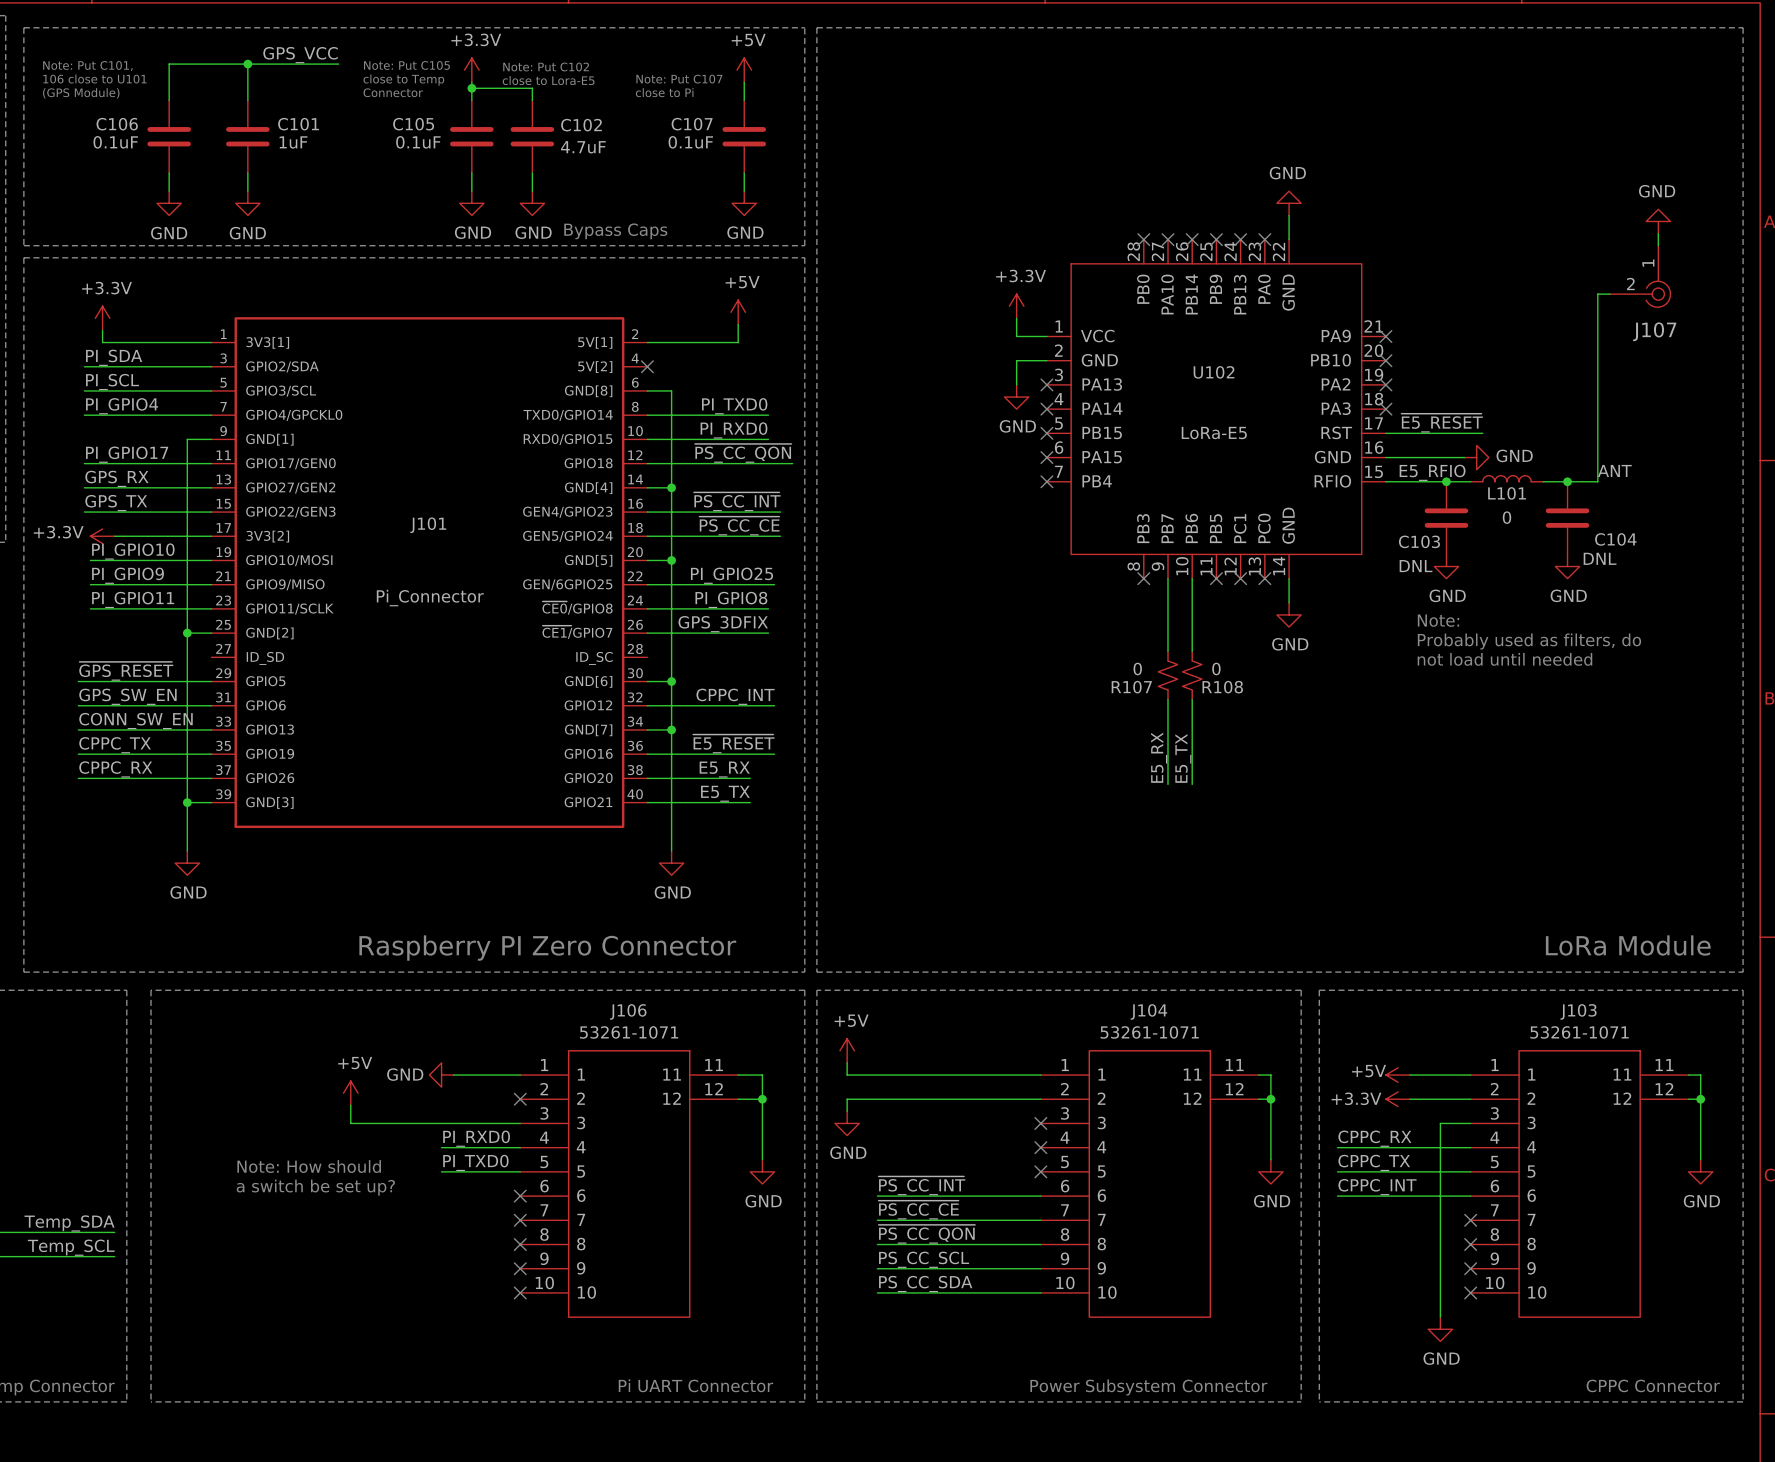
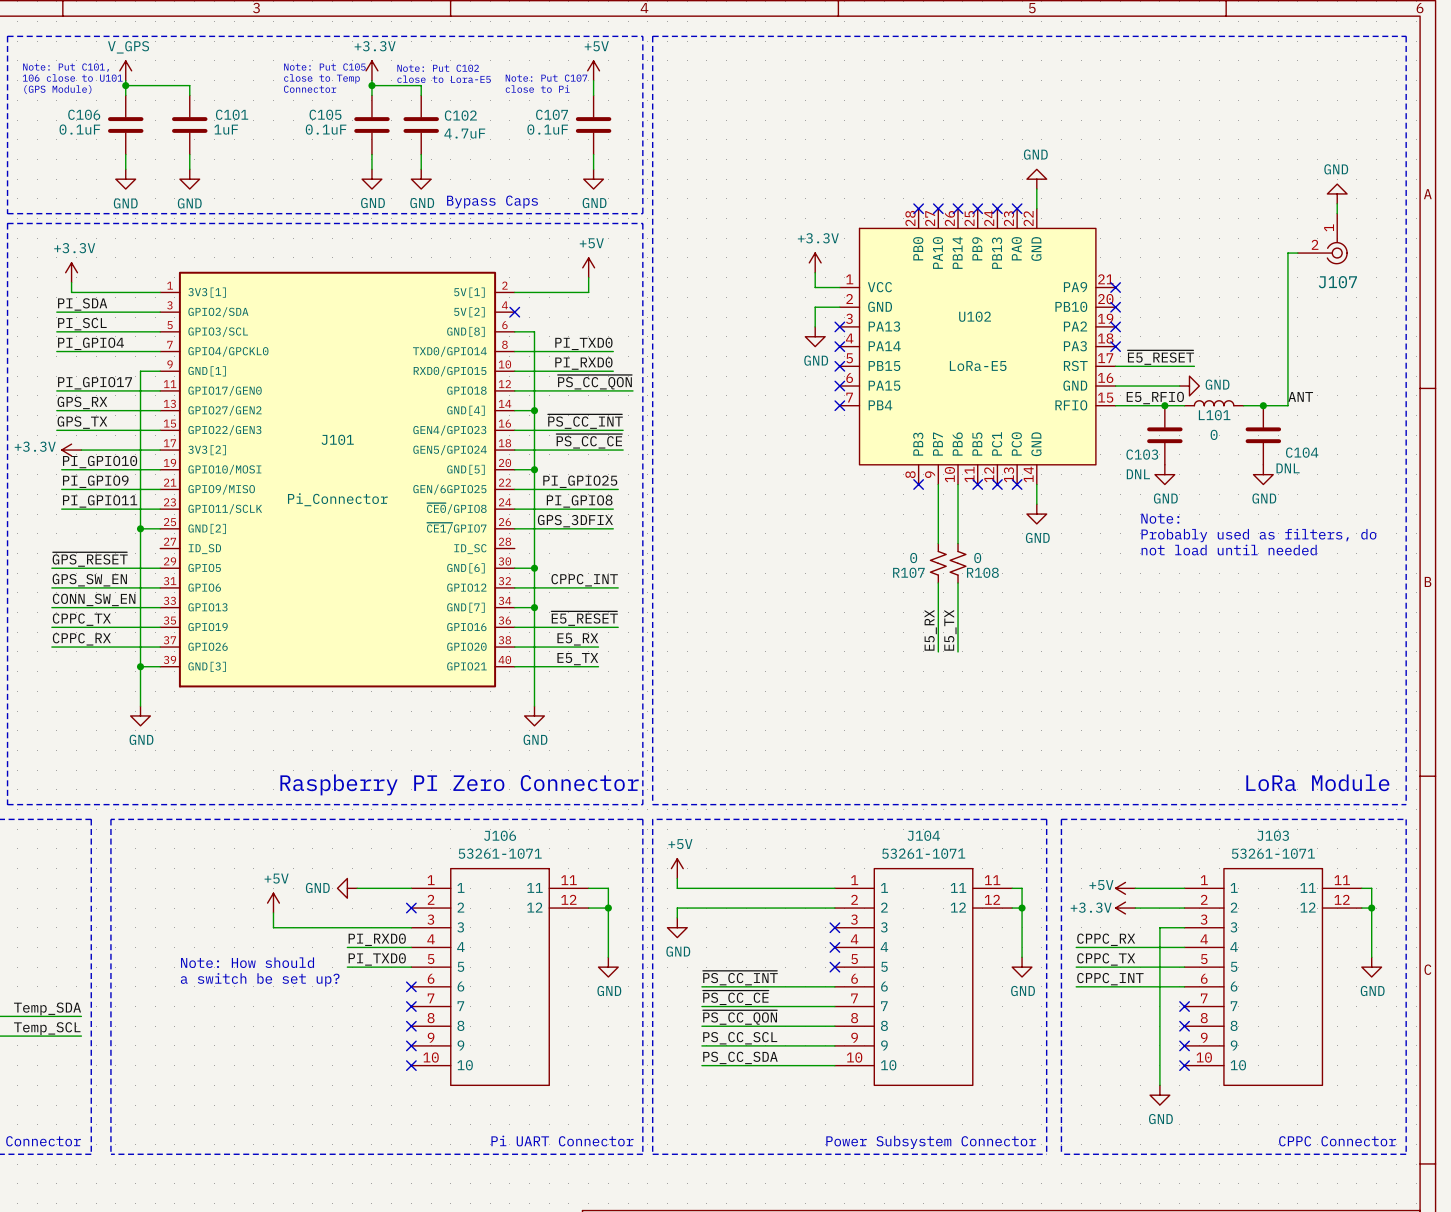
label: GPS_VCC (300, 55) -> none
wire: (247, 64) (247, 88) -> (125, 85) (189, 85)
junction: (247, 64) -> none
wire: (338, 64) (169, 64) (169, 82) -> none
power symbol: none -> V_GPS (125, 70)
junction: none -> (125, 85)

